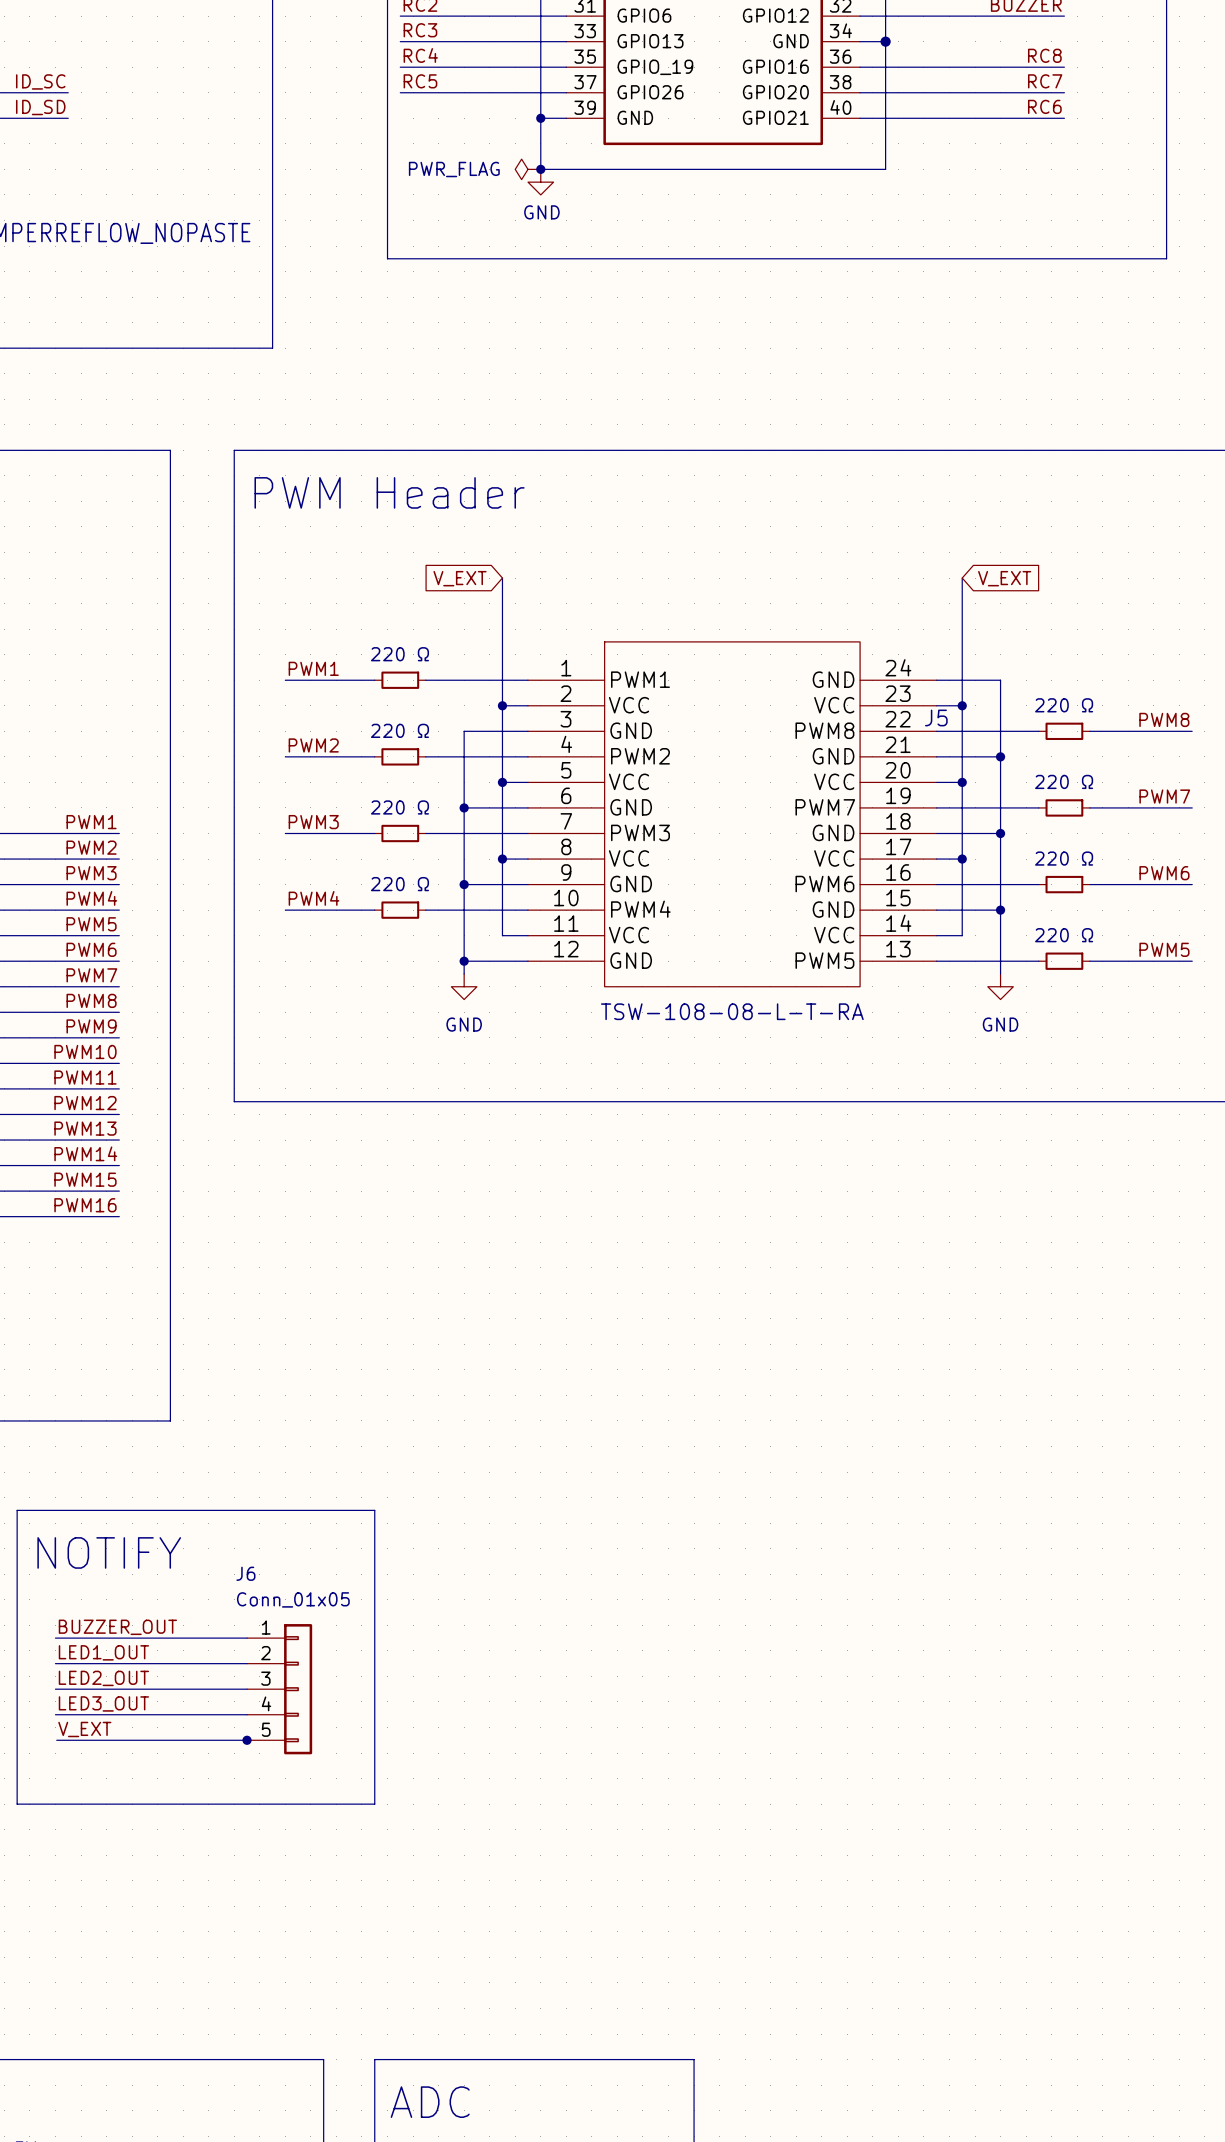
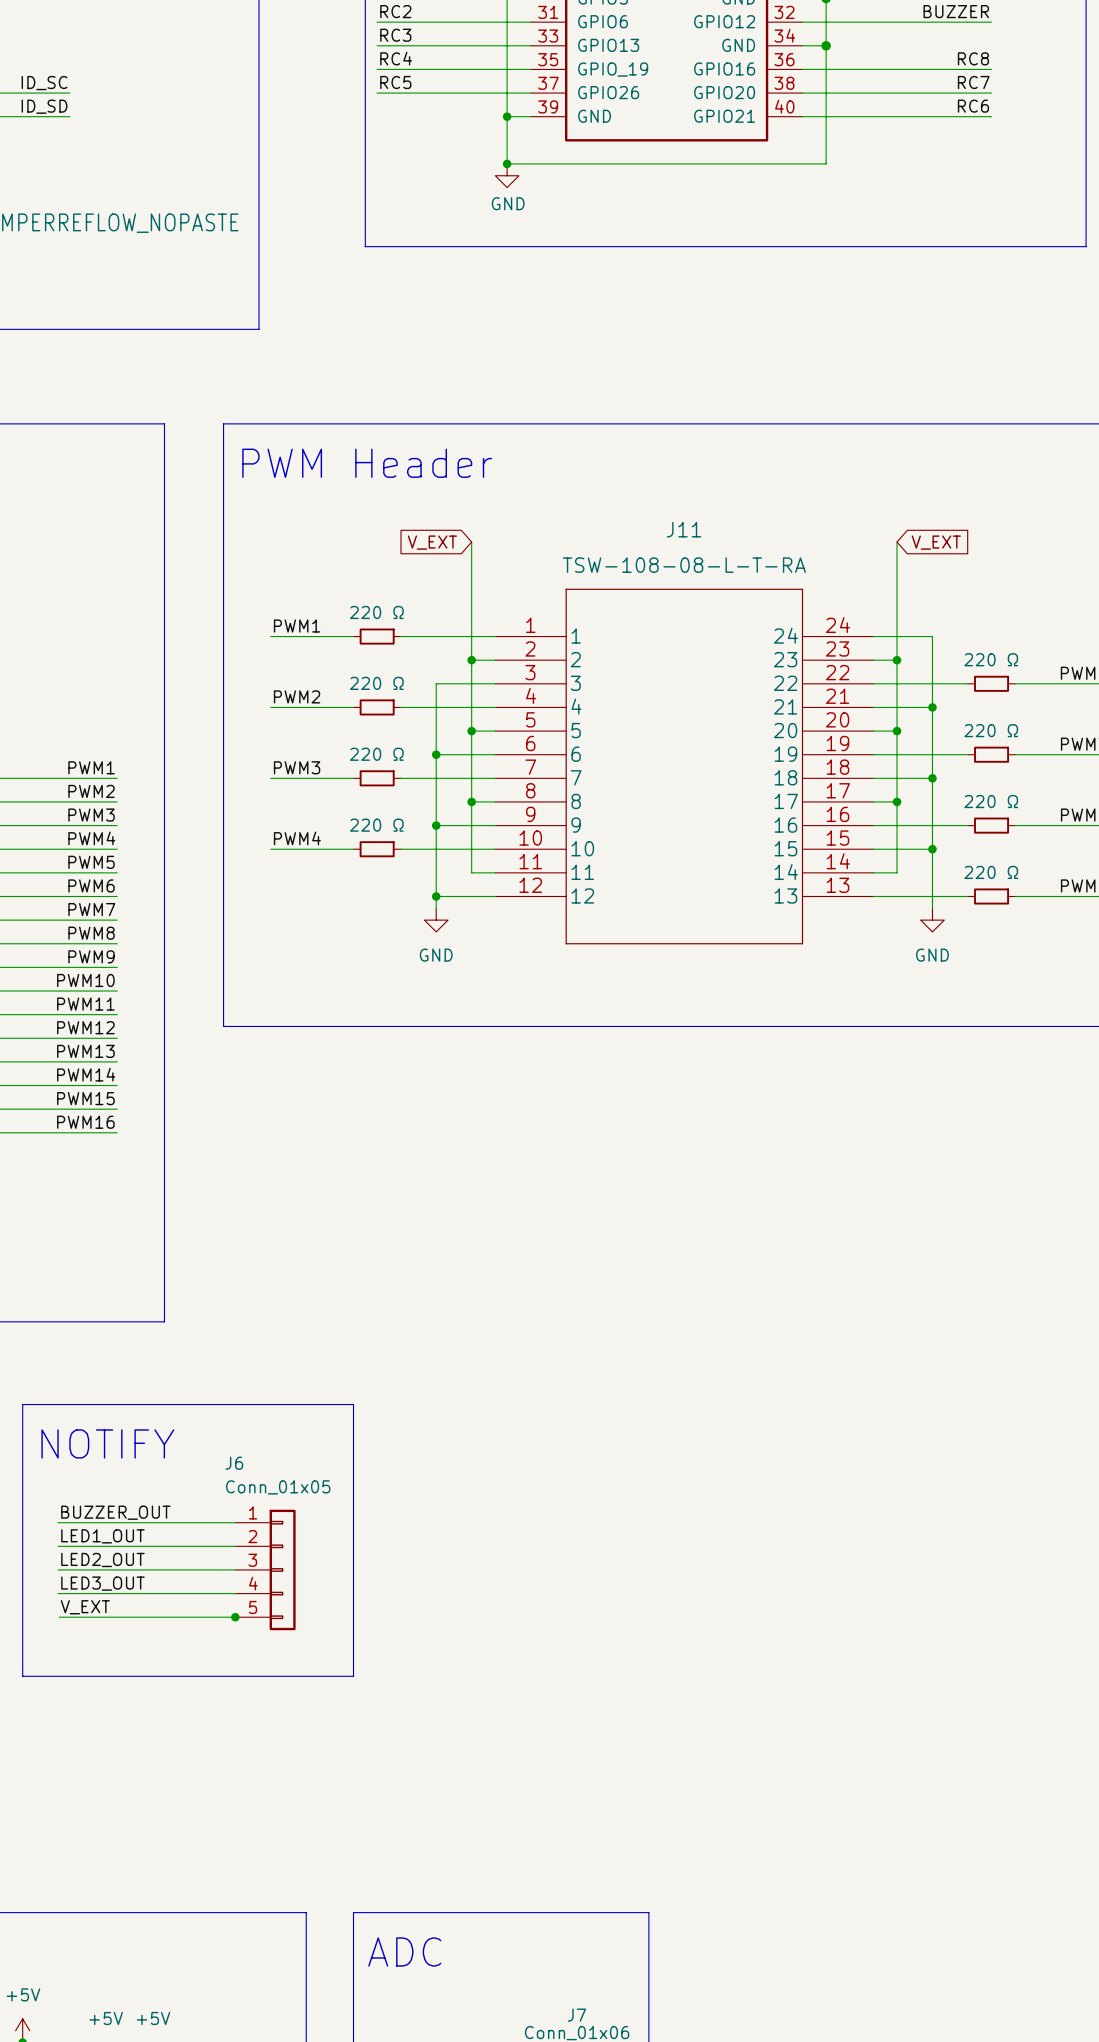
power symbol: PWR_FLAG (528, 169) -> none
J11: none -> TSW-108-08-L-T-RA (684, 766)
J5: TSW-108-08-L-T-RA (732, 833) -> none

